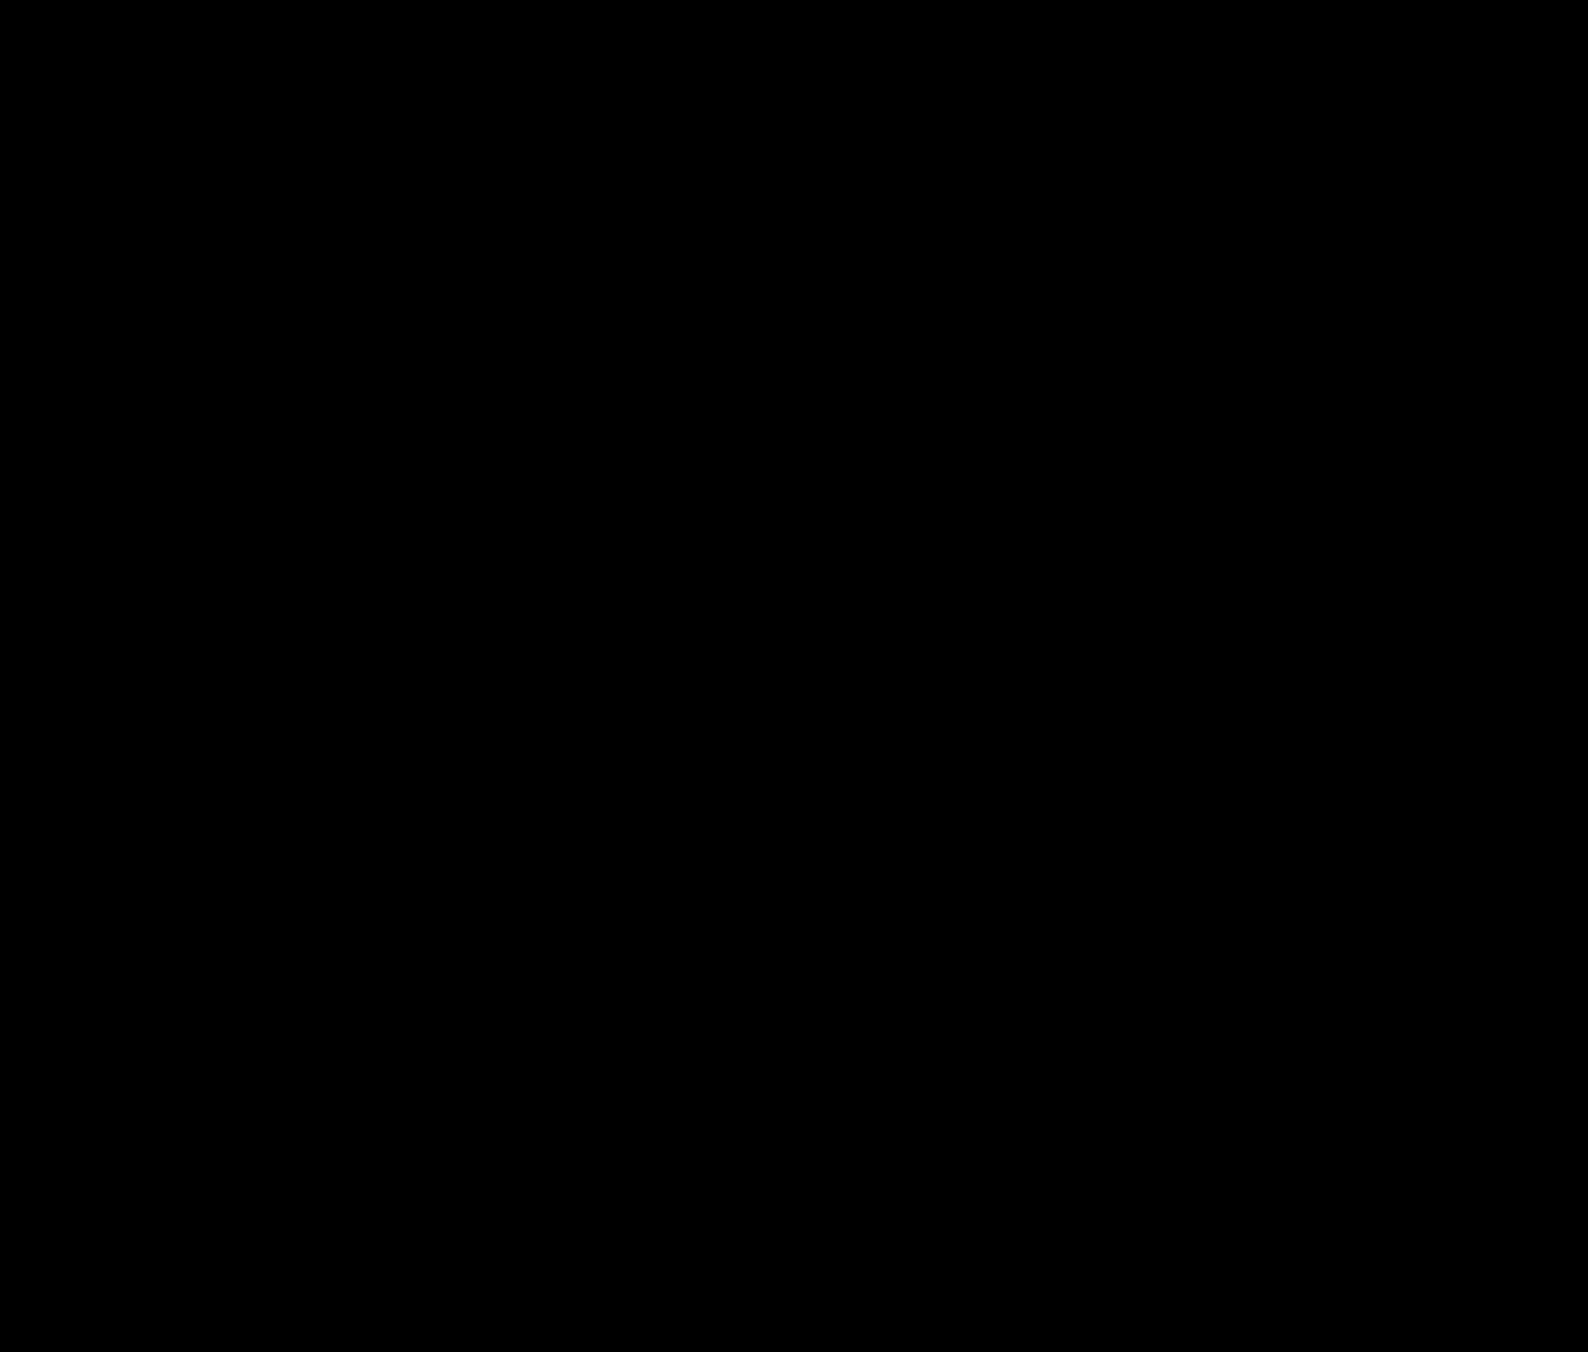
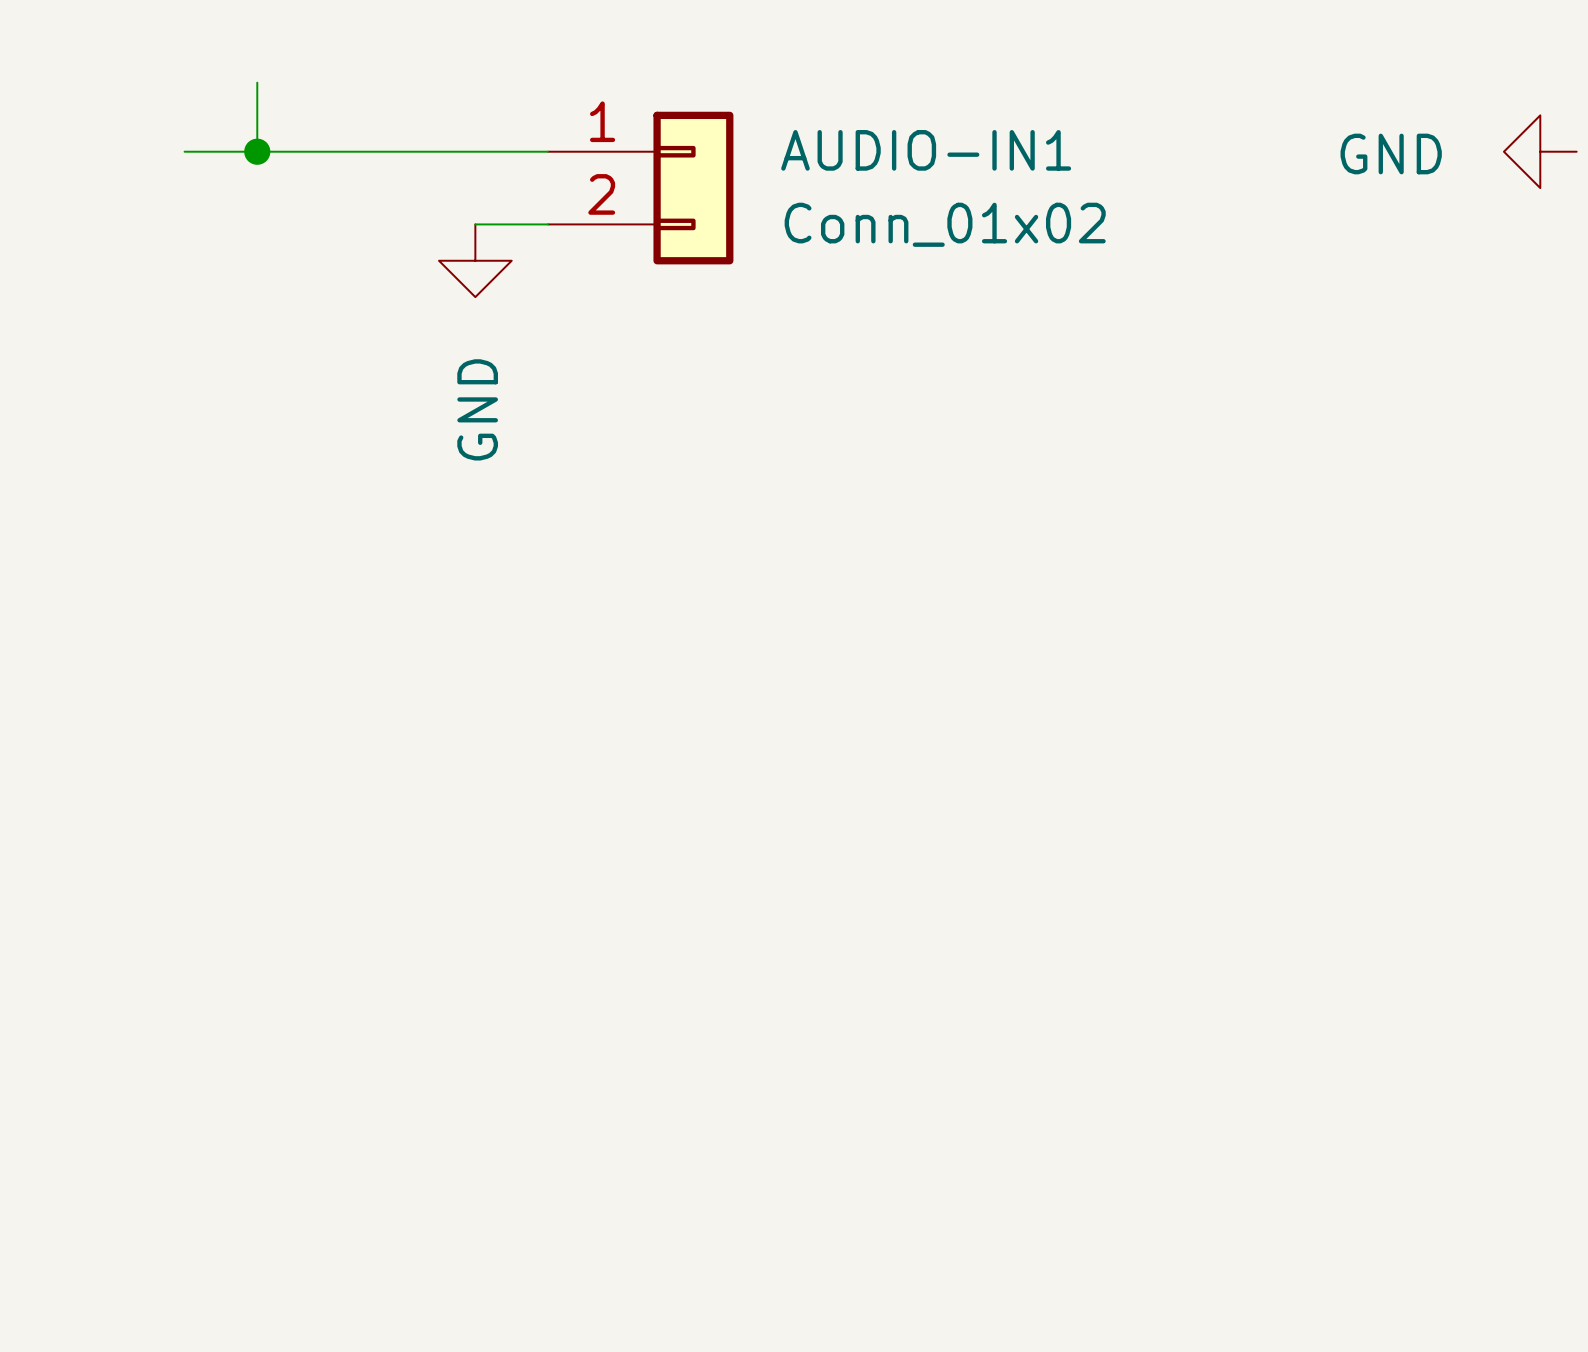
wire: none -> (257, 82) (257, 151)
wire: none -> (184, 151) (548, 151)
junction: none -> (257, 151)
power symbol: none -> GND (1540, 151)
AUDIO-IN1: none -> Conn_01x02 (640, 188)
wire: none -> (475, 224) (548, 224)
power symbol: none -> GND (475, 260)

